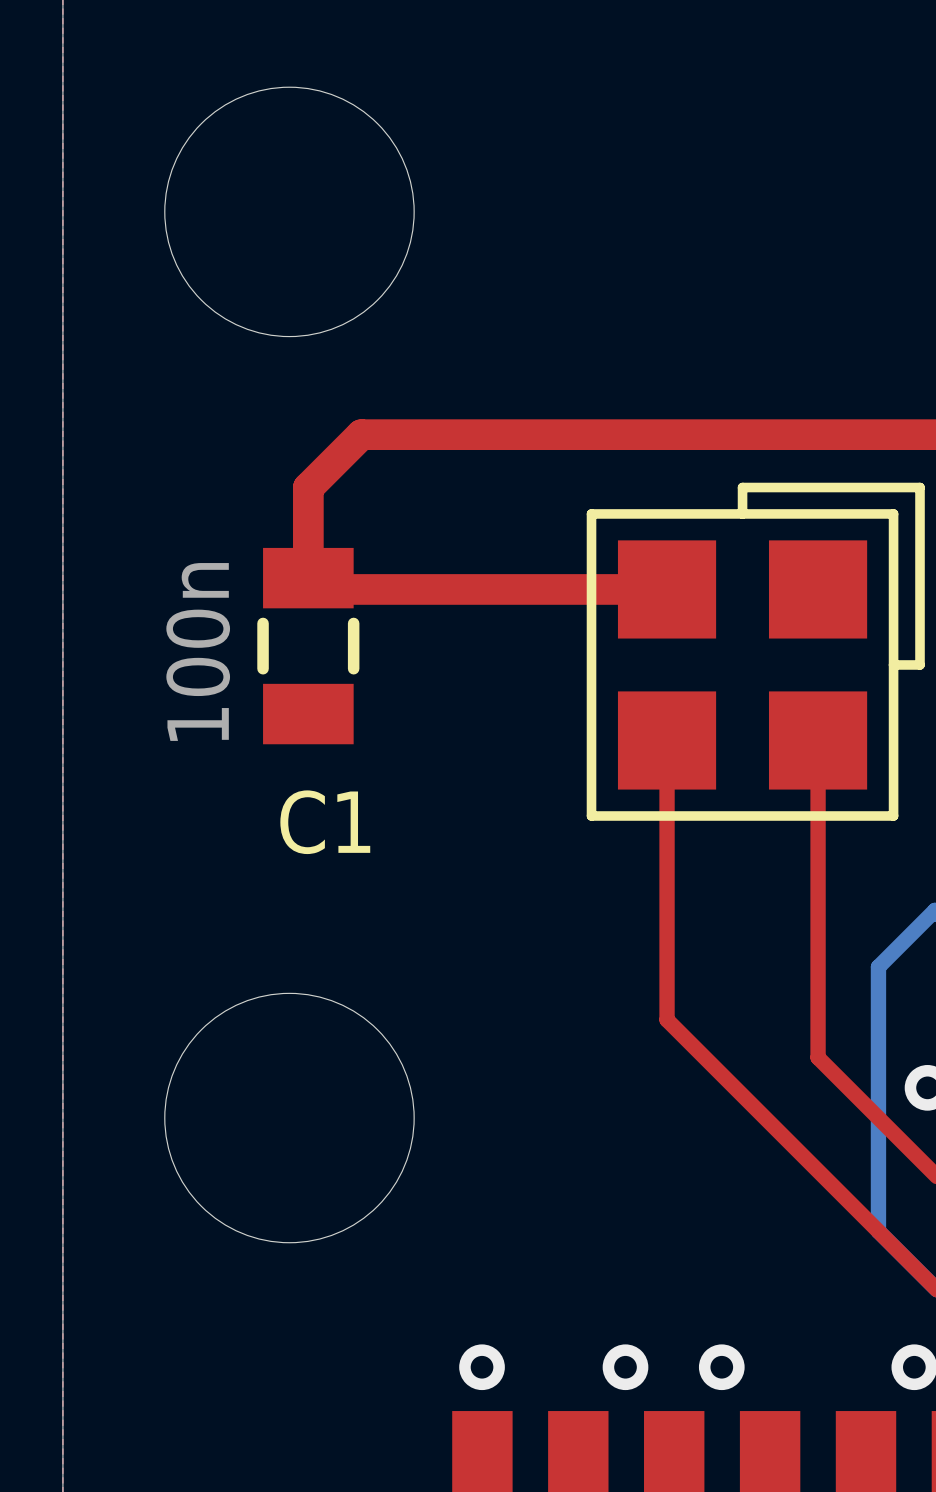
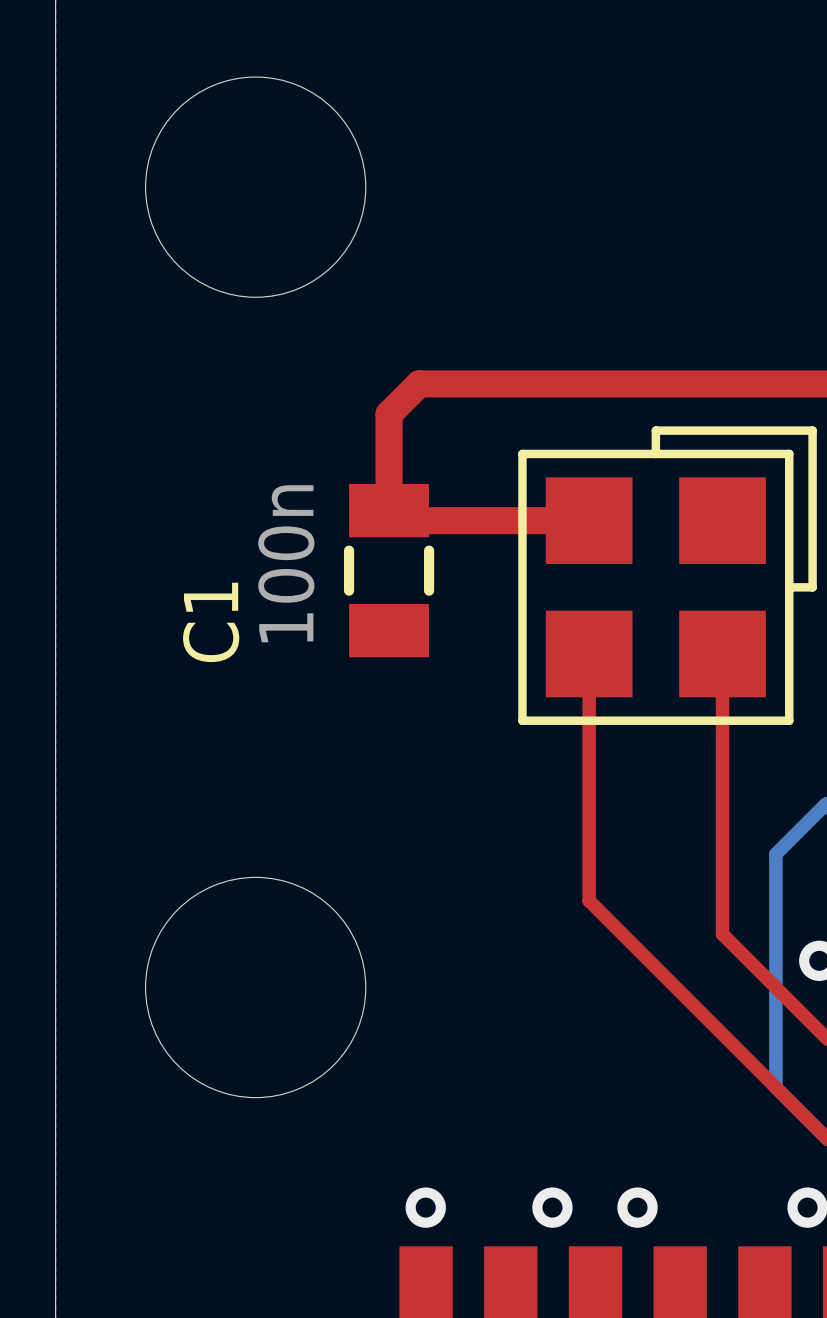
top track: (474, 434) (361, 434) (308, 487) (308, 578) (310, 589) (443, 589) -> (419, 383) (389, 414) (389, 510) (391, 520)
C1 position: (308, 646) -> (389, 570)
C1 value position: 100n (198, 651) -> 100n (286, 563)
C1 name rotation: 0° (325, 822) -> 90° counterclockwise (211, 622)

